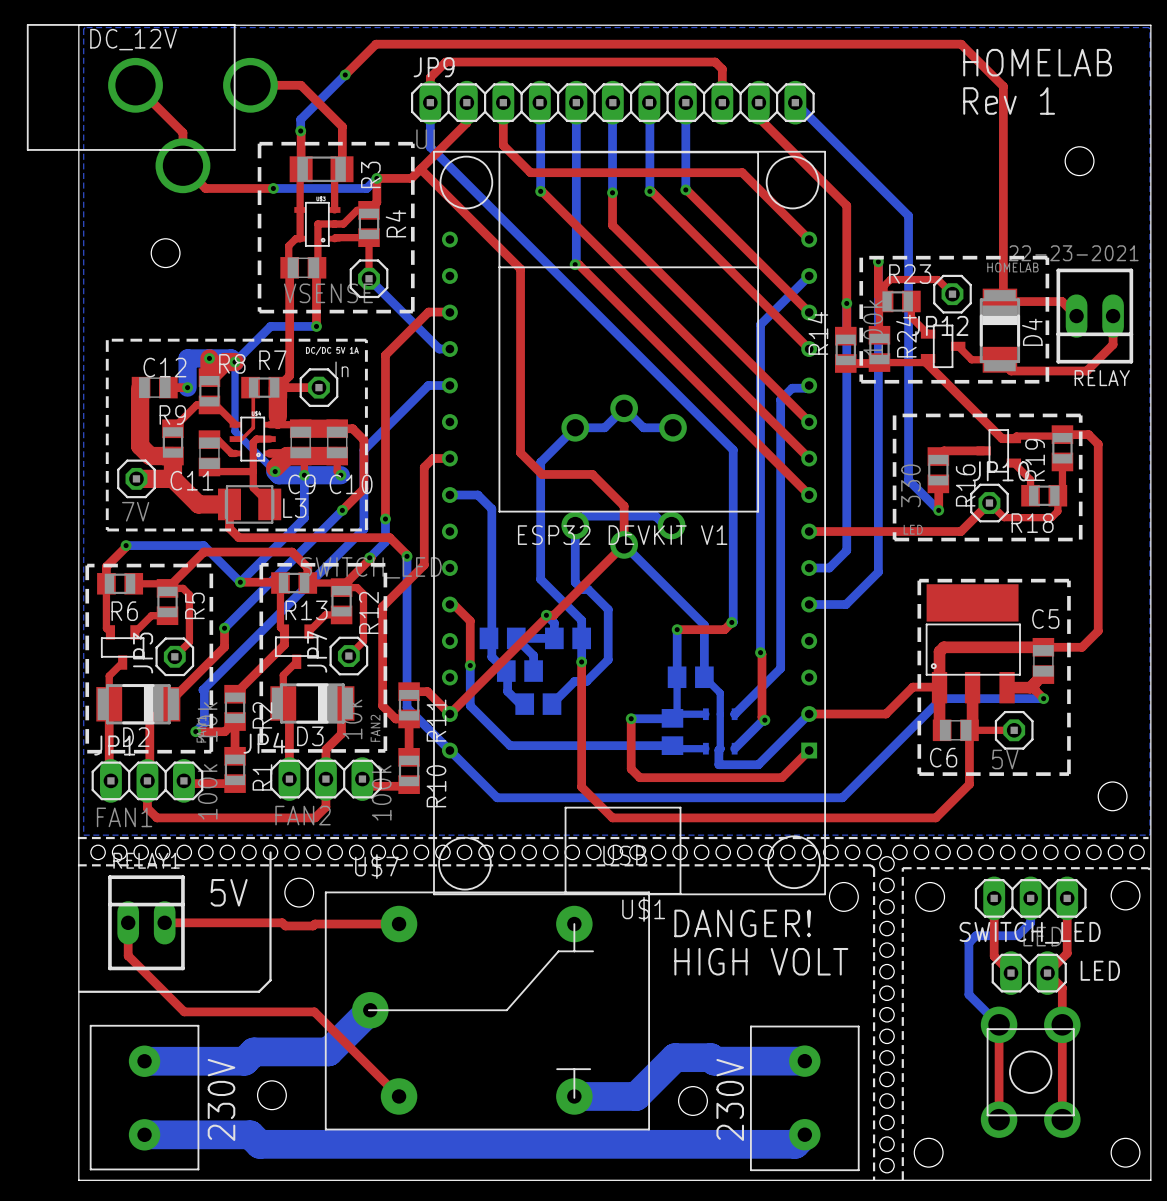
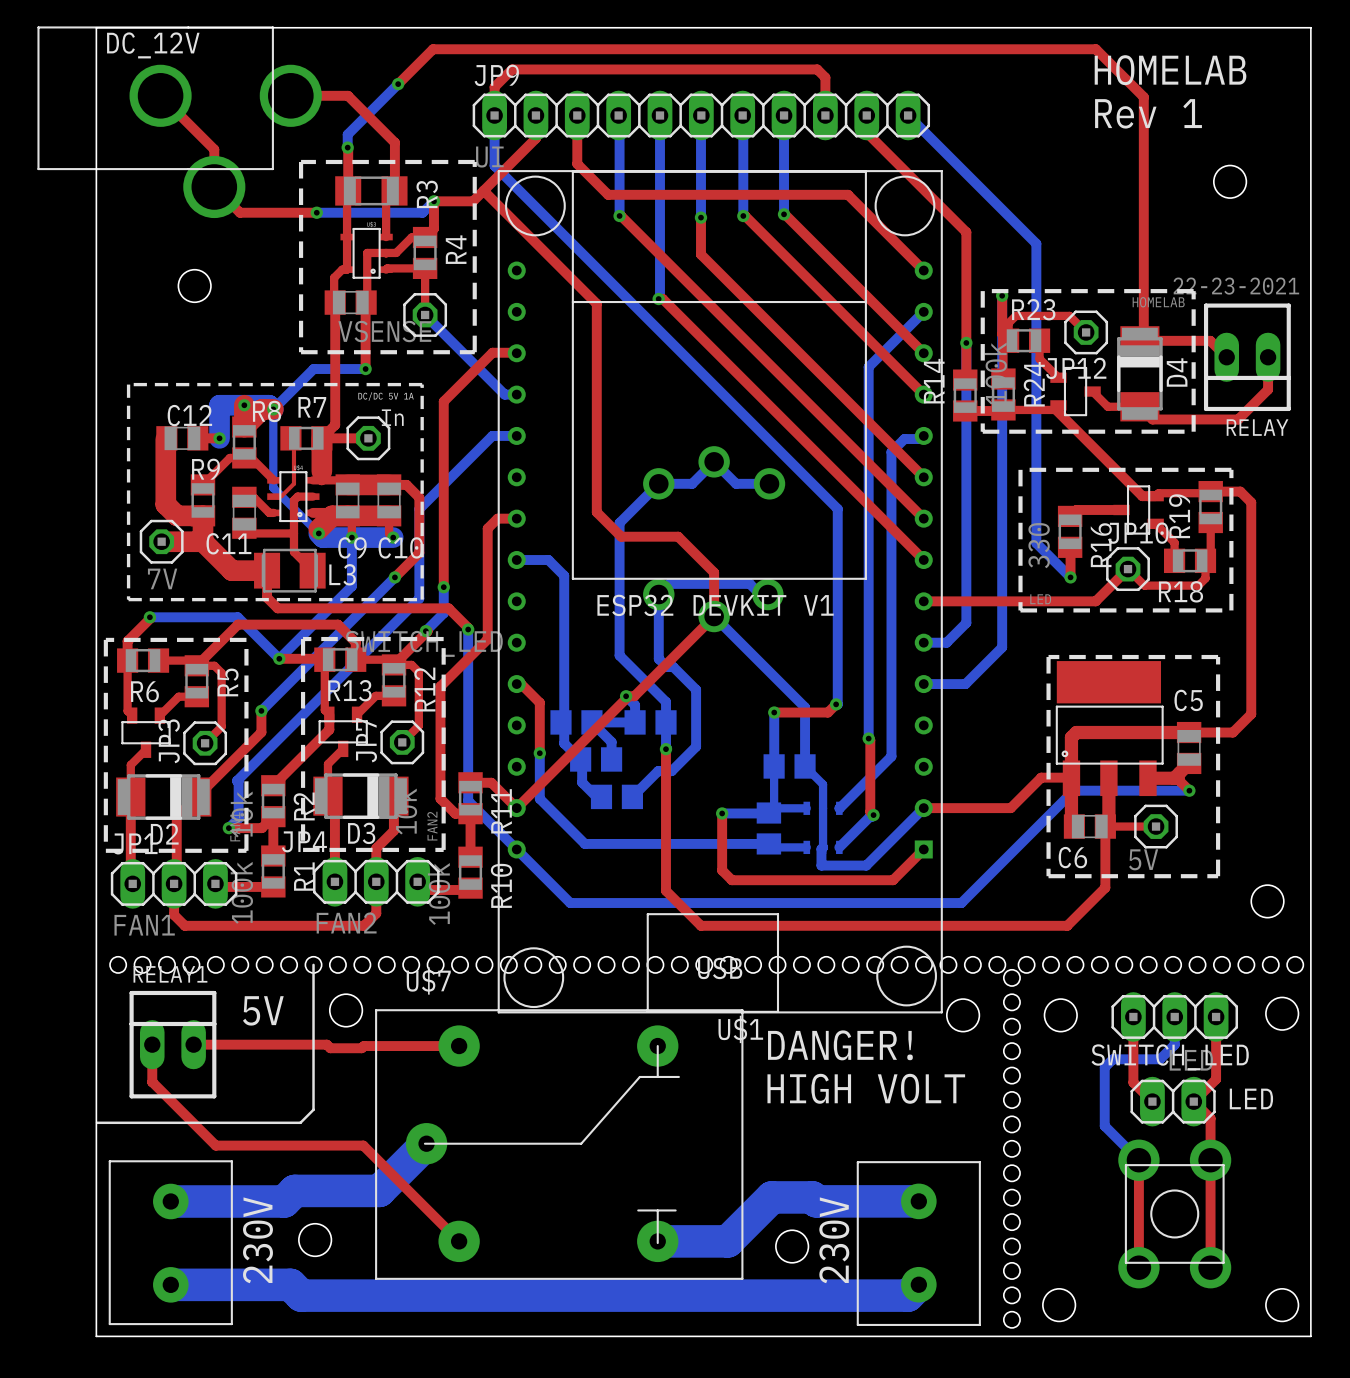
bottom zone outline: (85, 27) (1148, 27) (1149, 835) (83, 835) (85, 27) -> none
line: (77, 838) (1148, 838) -> none
line: (77, 865) (871, 865) (874, 868) (874, 1180) -> none
line: (1149, 869) (902, 868) (902, 1180) -> none

